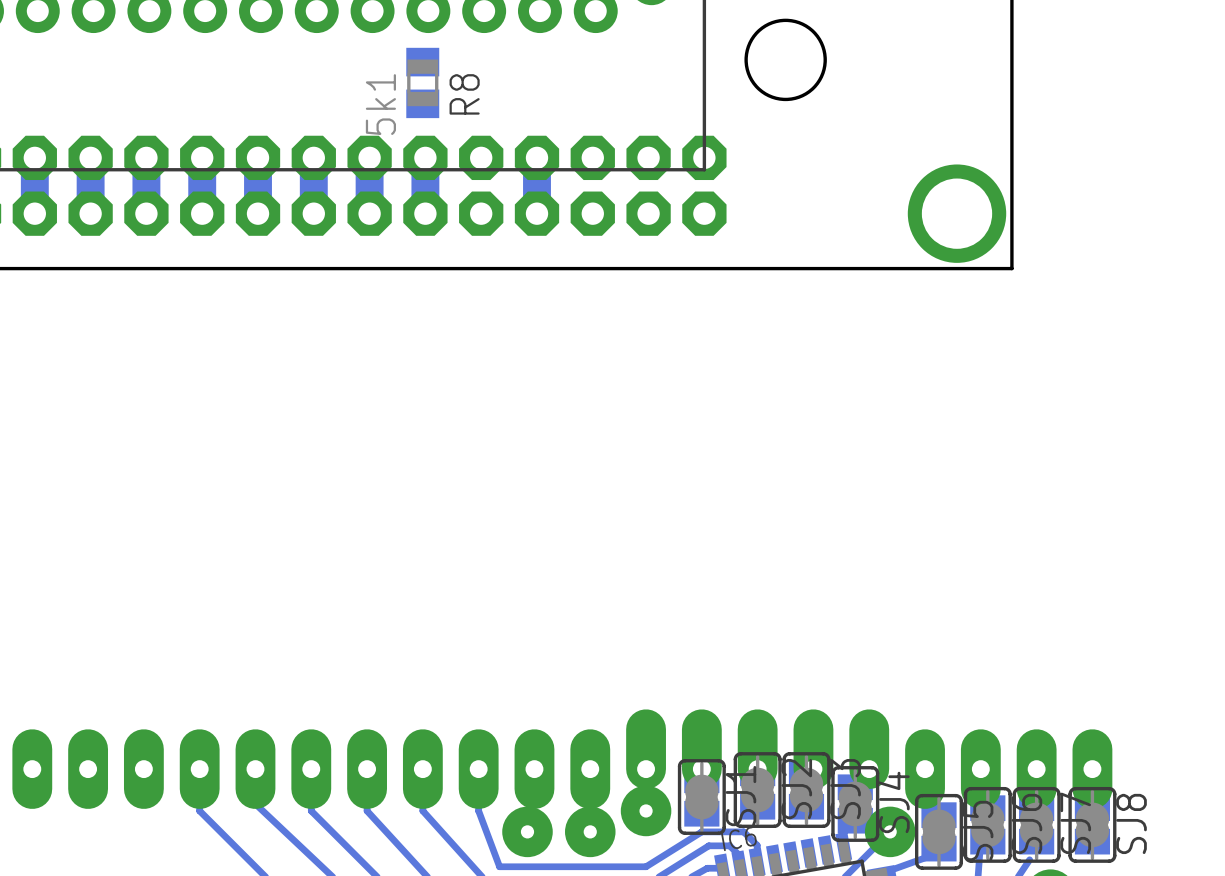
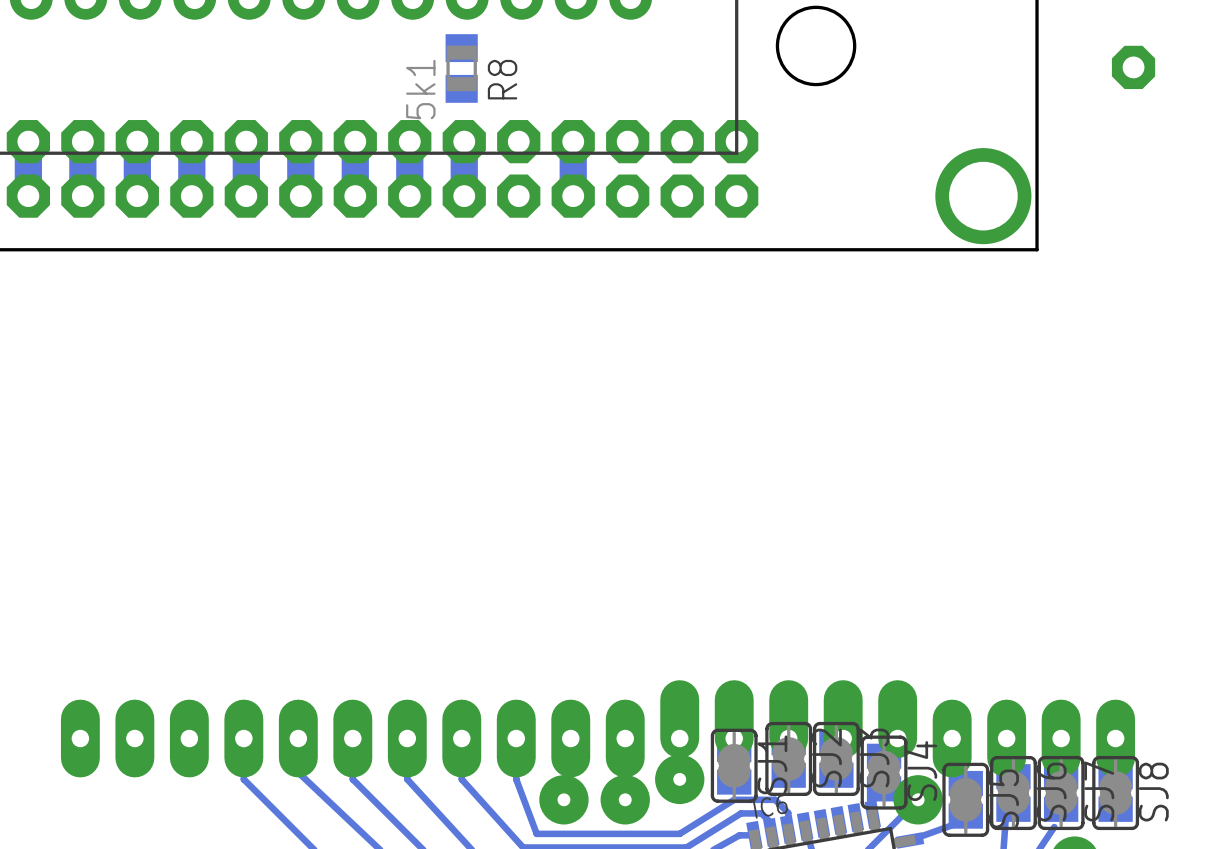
part: none -> (1133, 67)

